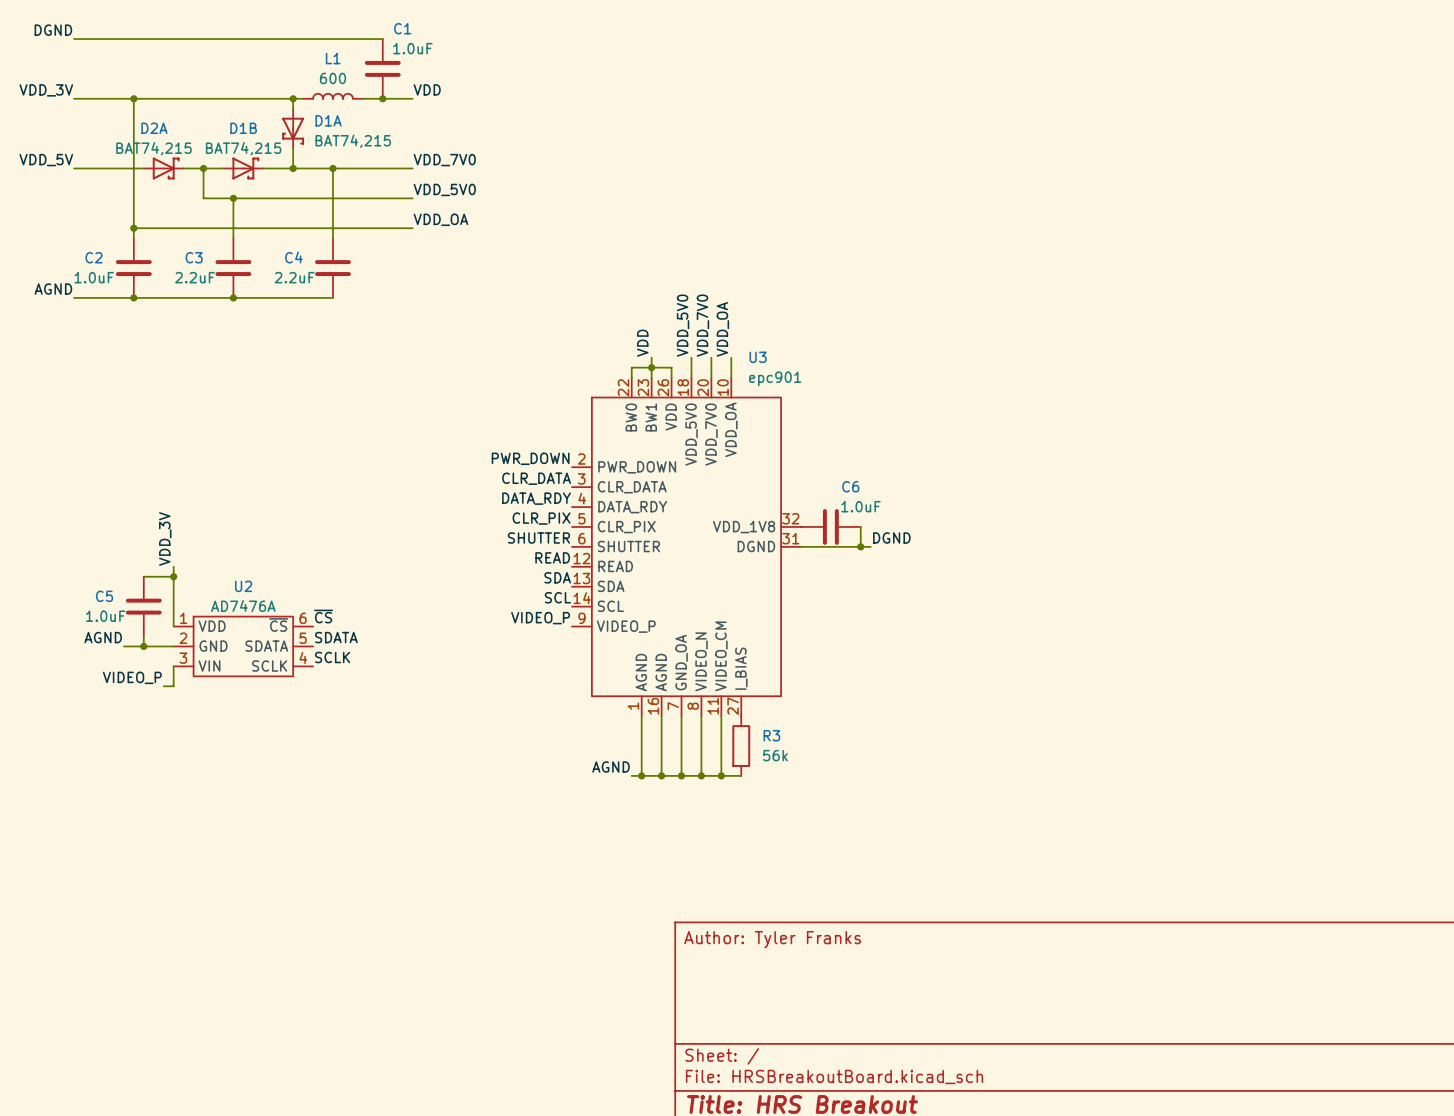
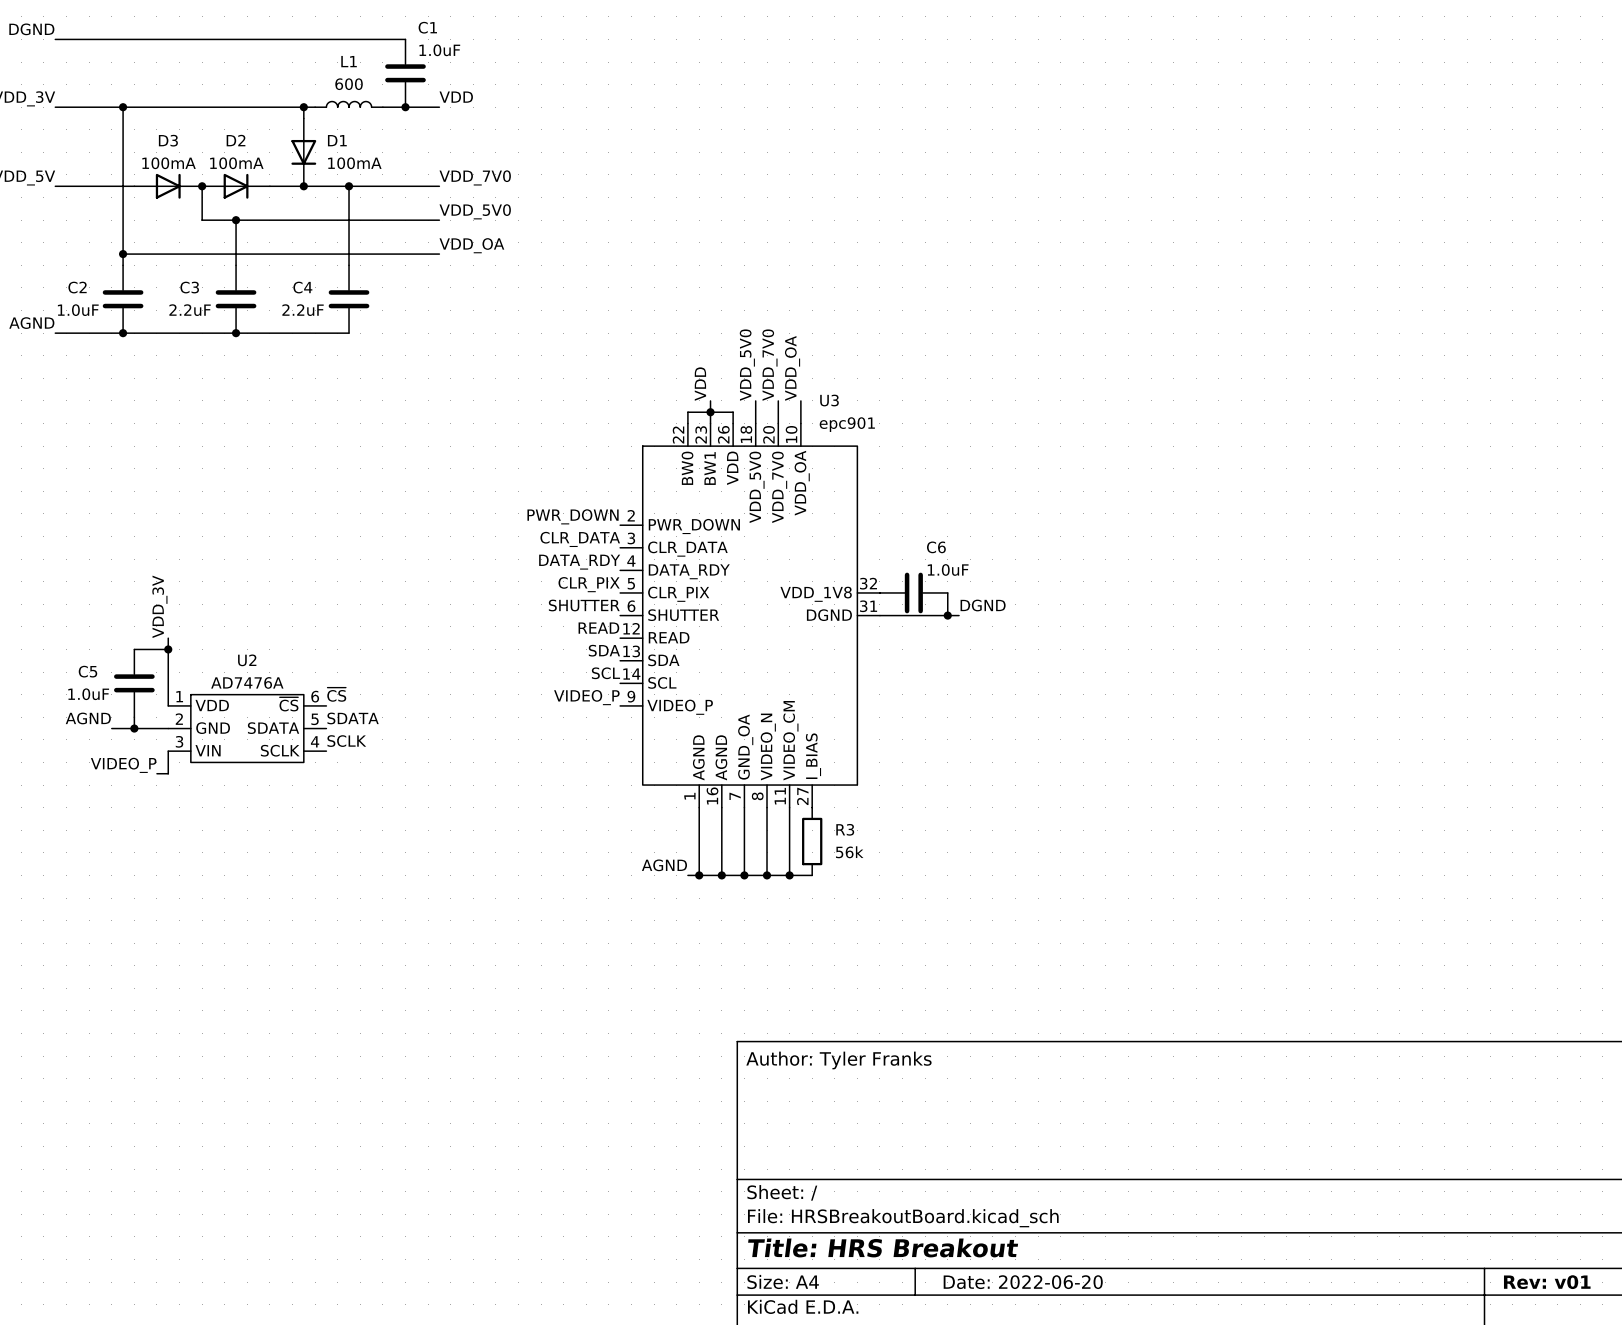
D1A: BAT74,215 (293, 128) -> none
D1: none -> 100mA (303, 152)
D2A: BAT74,215 (163, 168) -> none
D3: none -> 100mA (168, 186)
D2: none -> 100mA (236, 186)
D1B: BAT74,215 (243, 168) -> none

